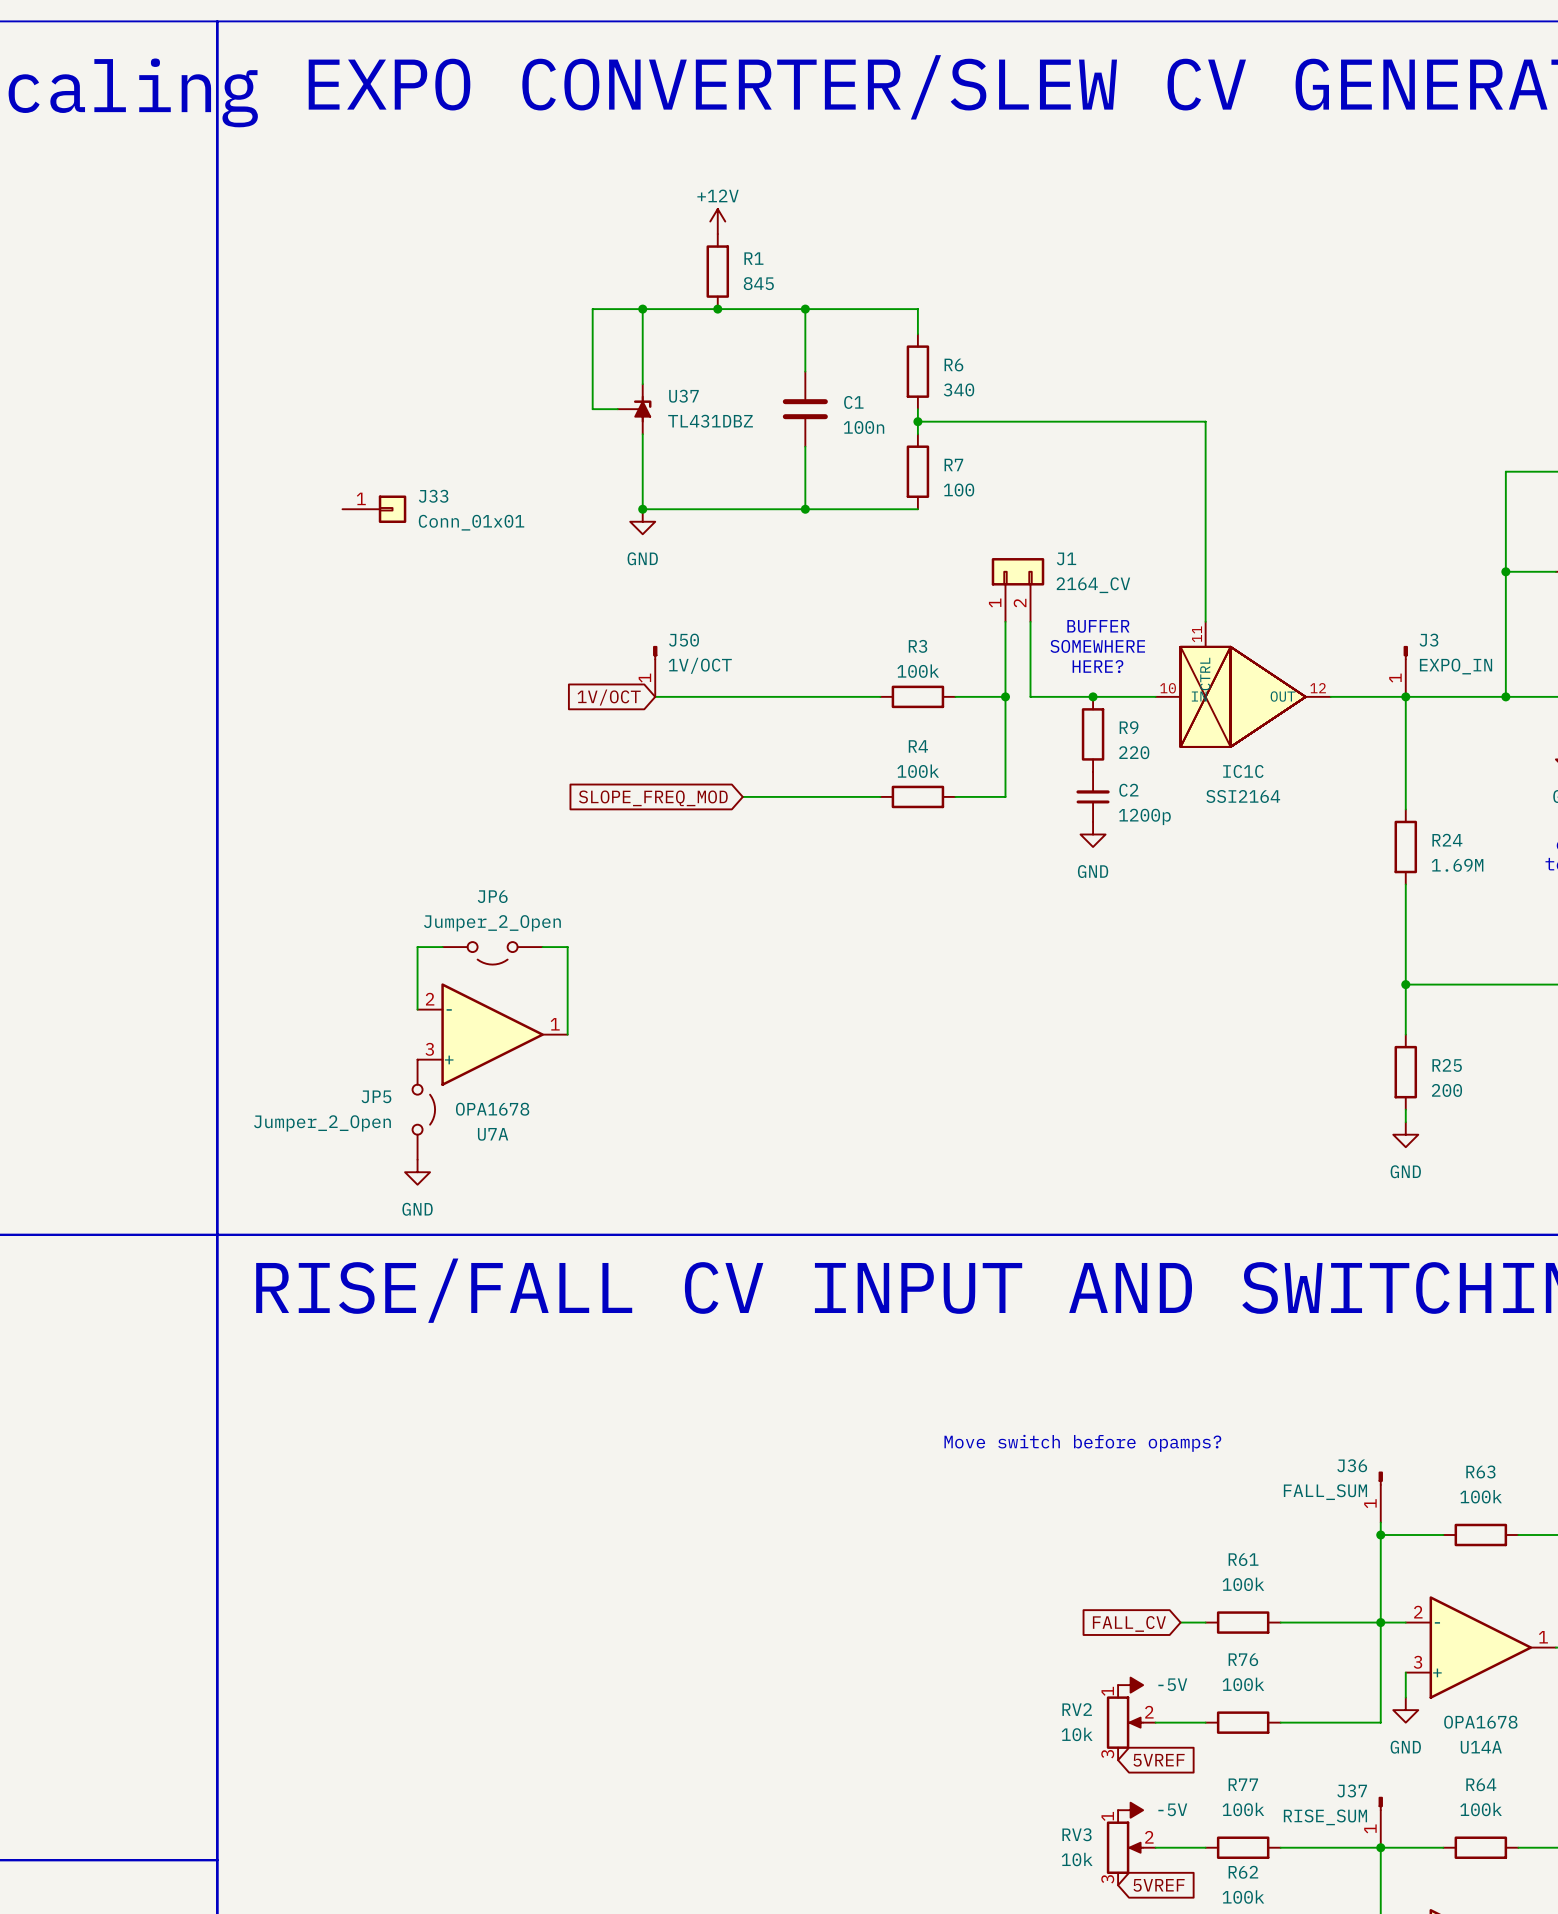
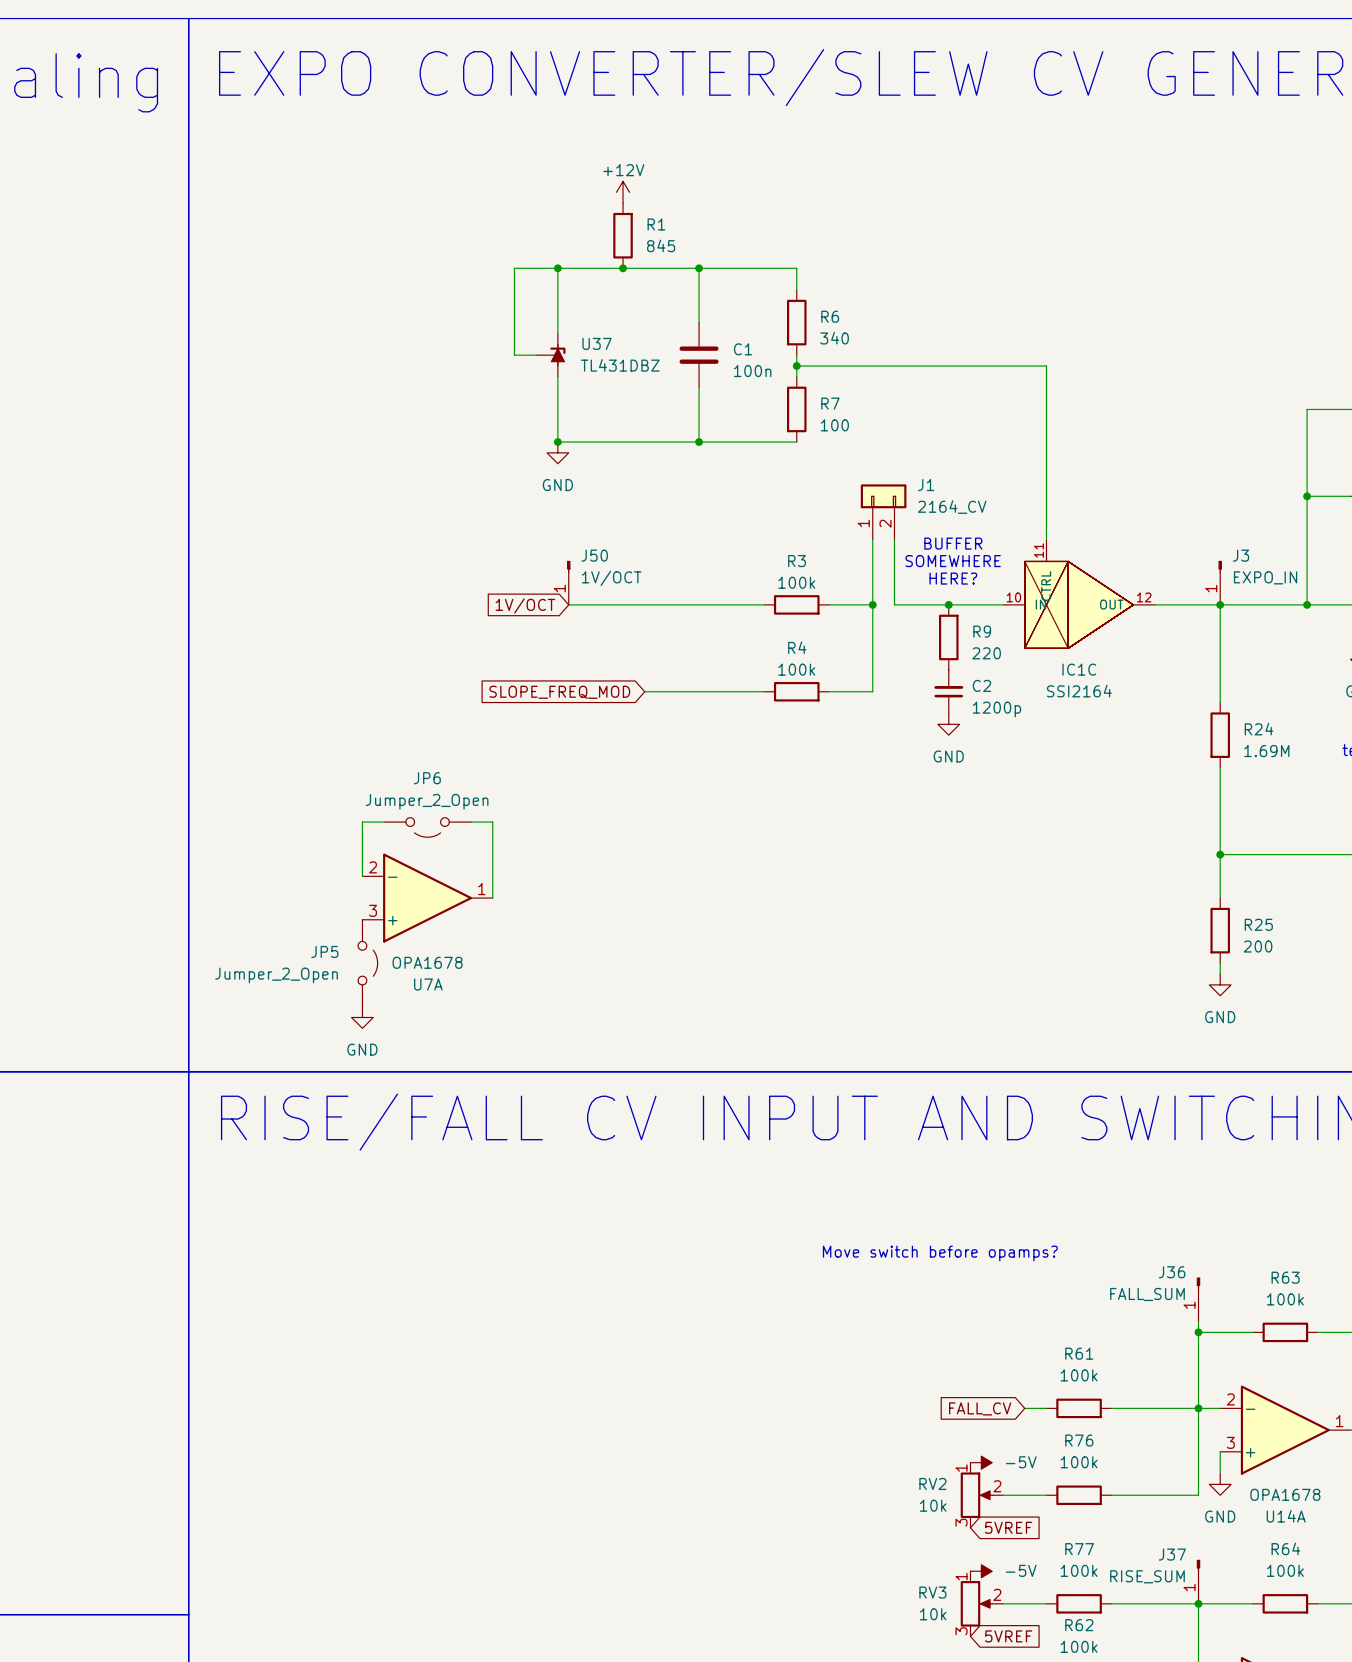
J33: Conn_01x01 (374, 509) -> none

